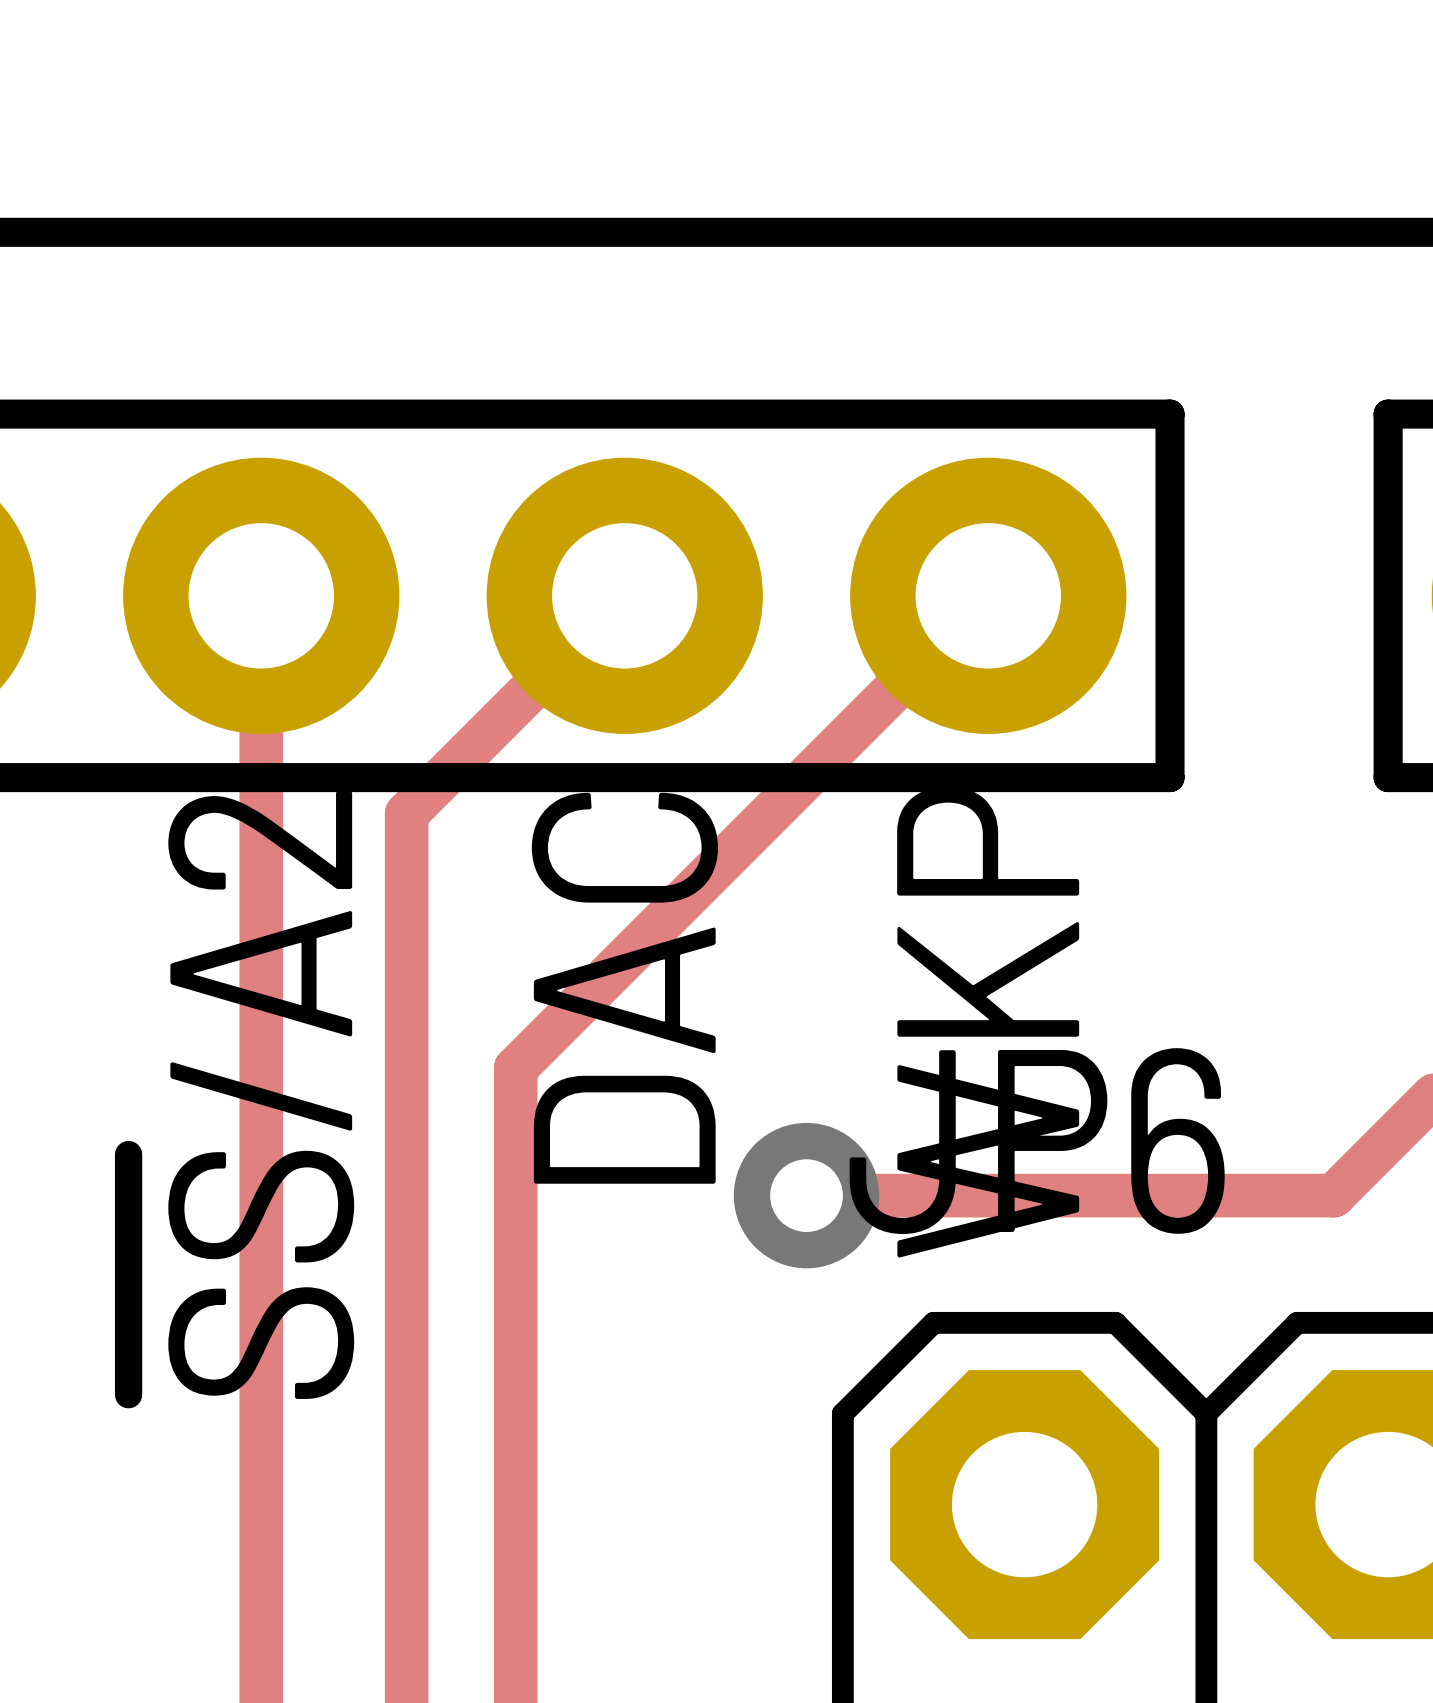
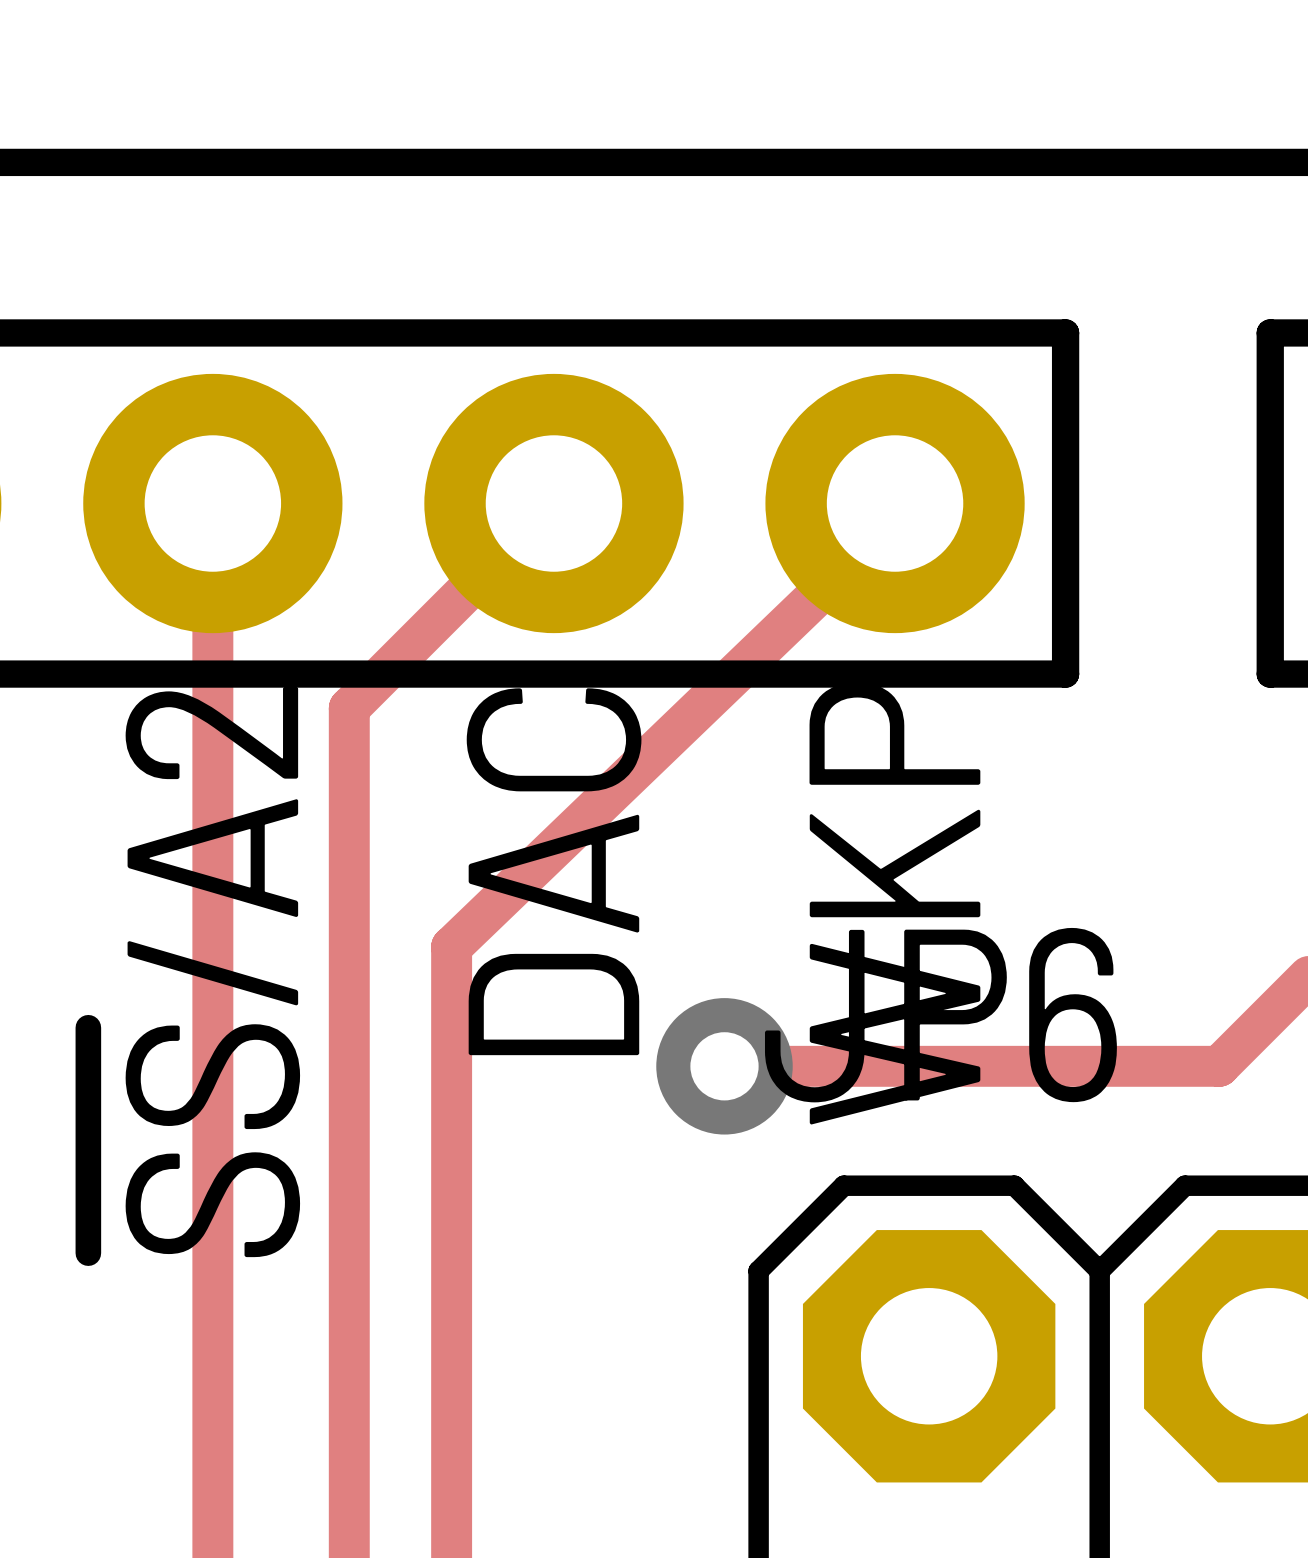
track: (988, 595) (515, 1068) -> (895, 520) (451, 946)

